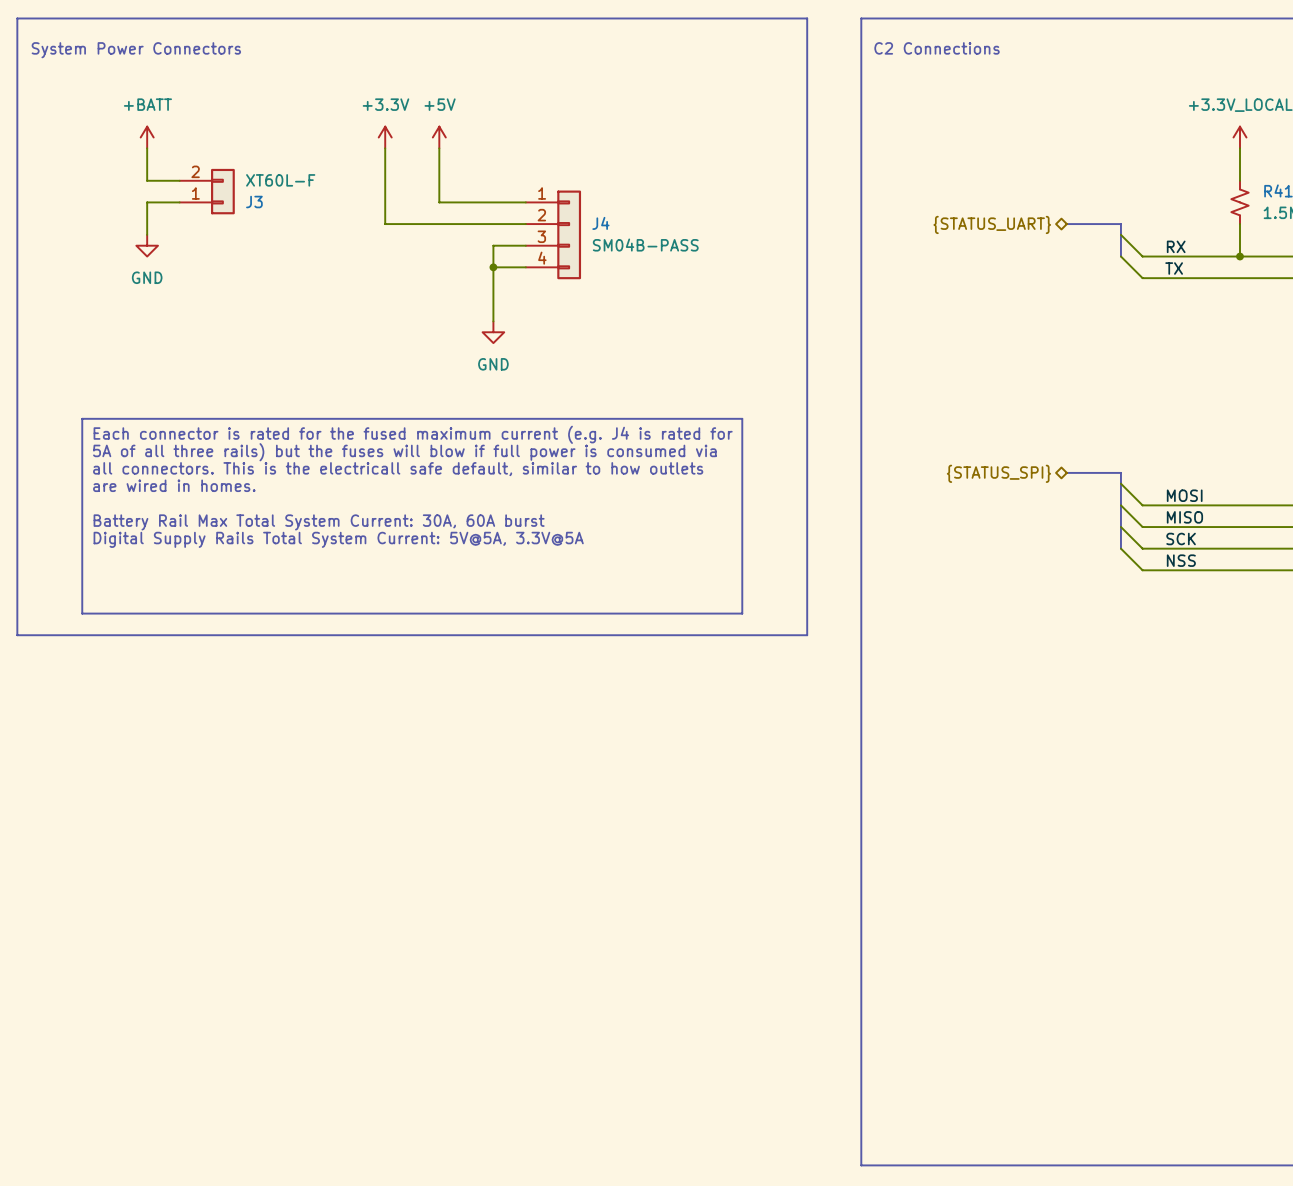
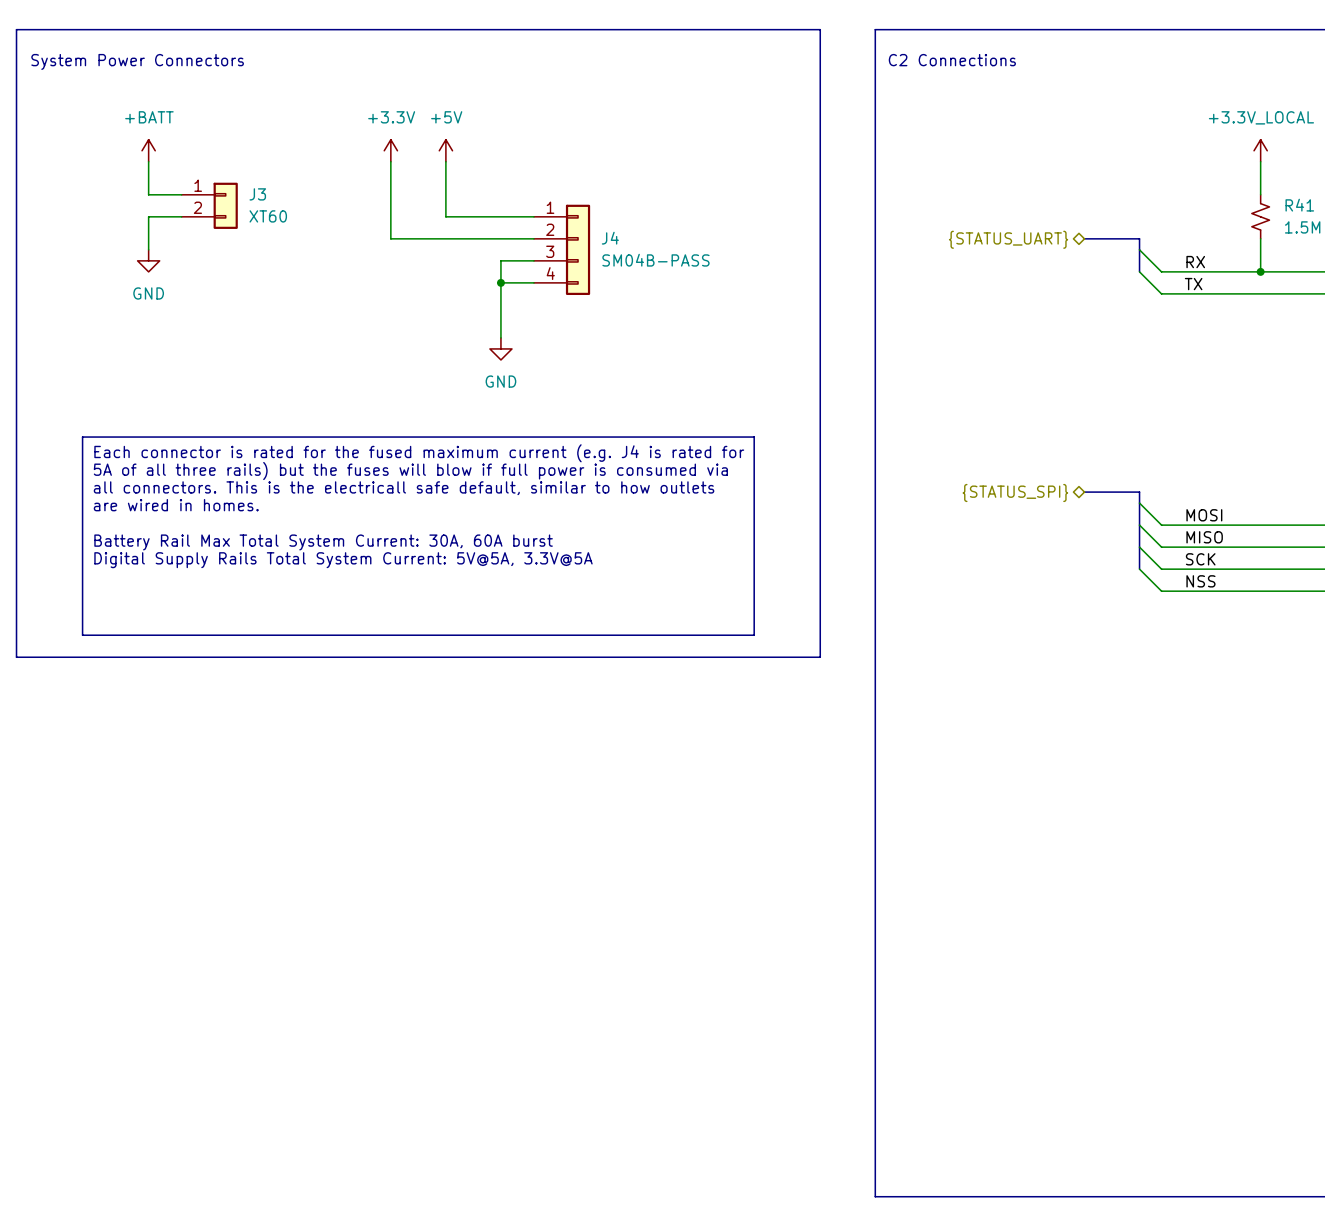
J3 value: XT60L-F (280, 180) -> XT60 (268, 216)
J3 flip: as is (222, 191) -> up-down (225, 205)

